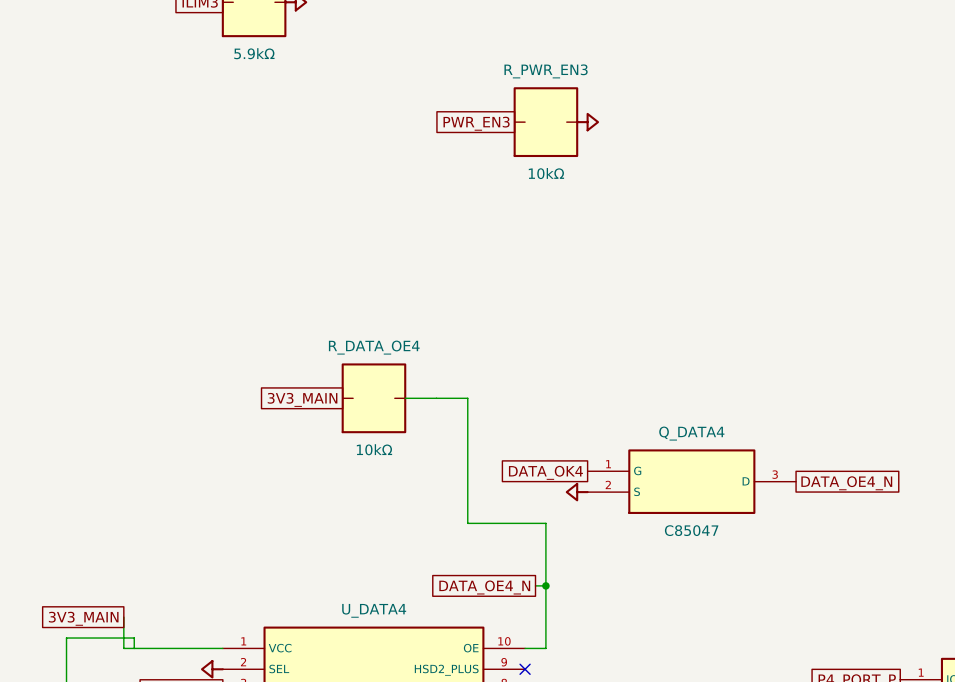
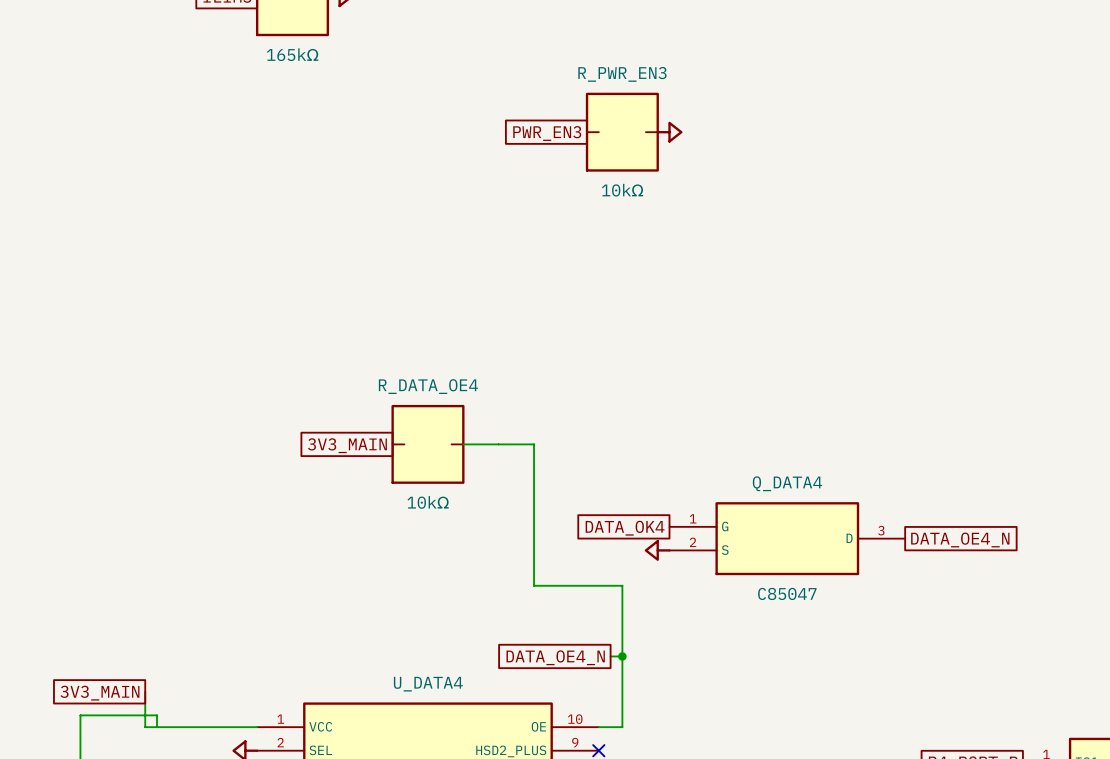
part value: 5.9kΩ (254, 53) -> 165kΩ (292, 54)

